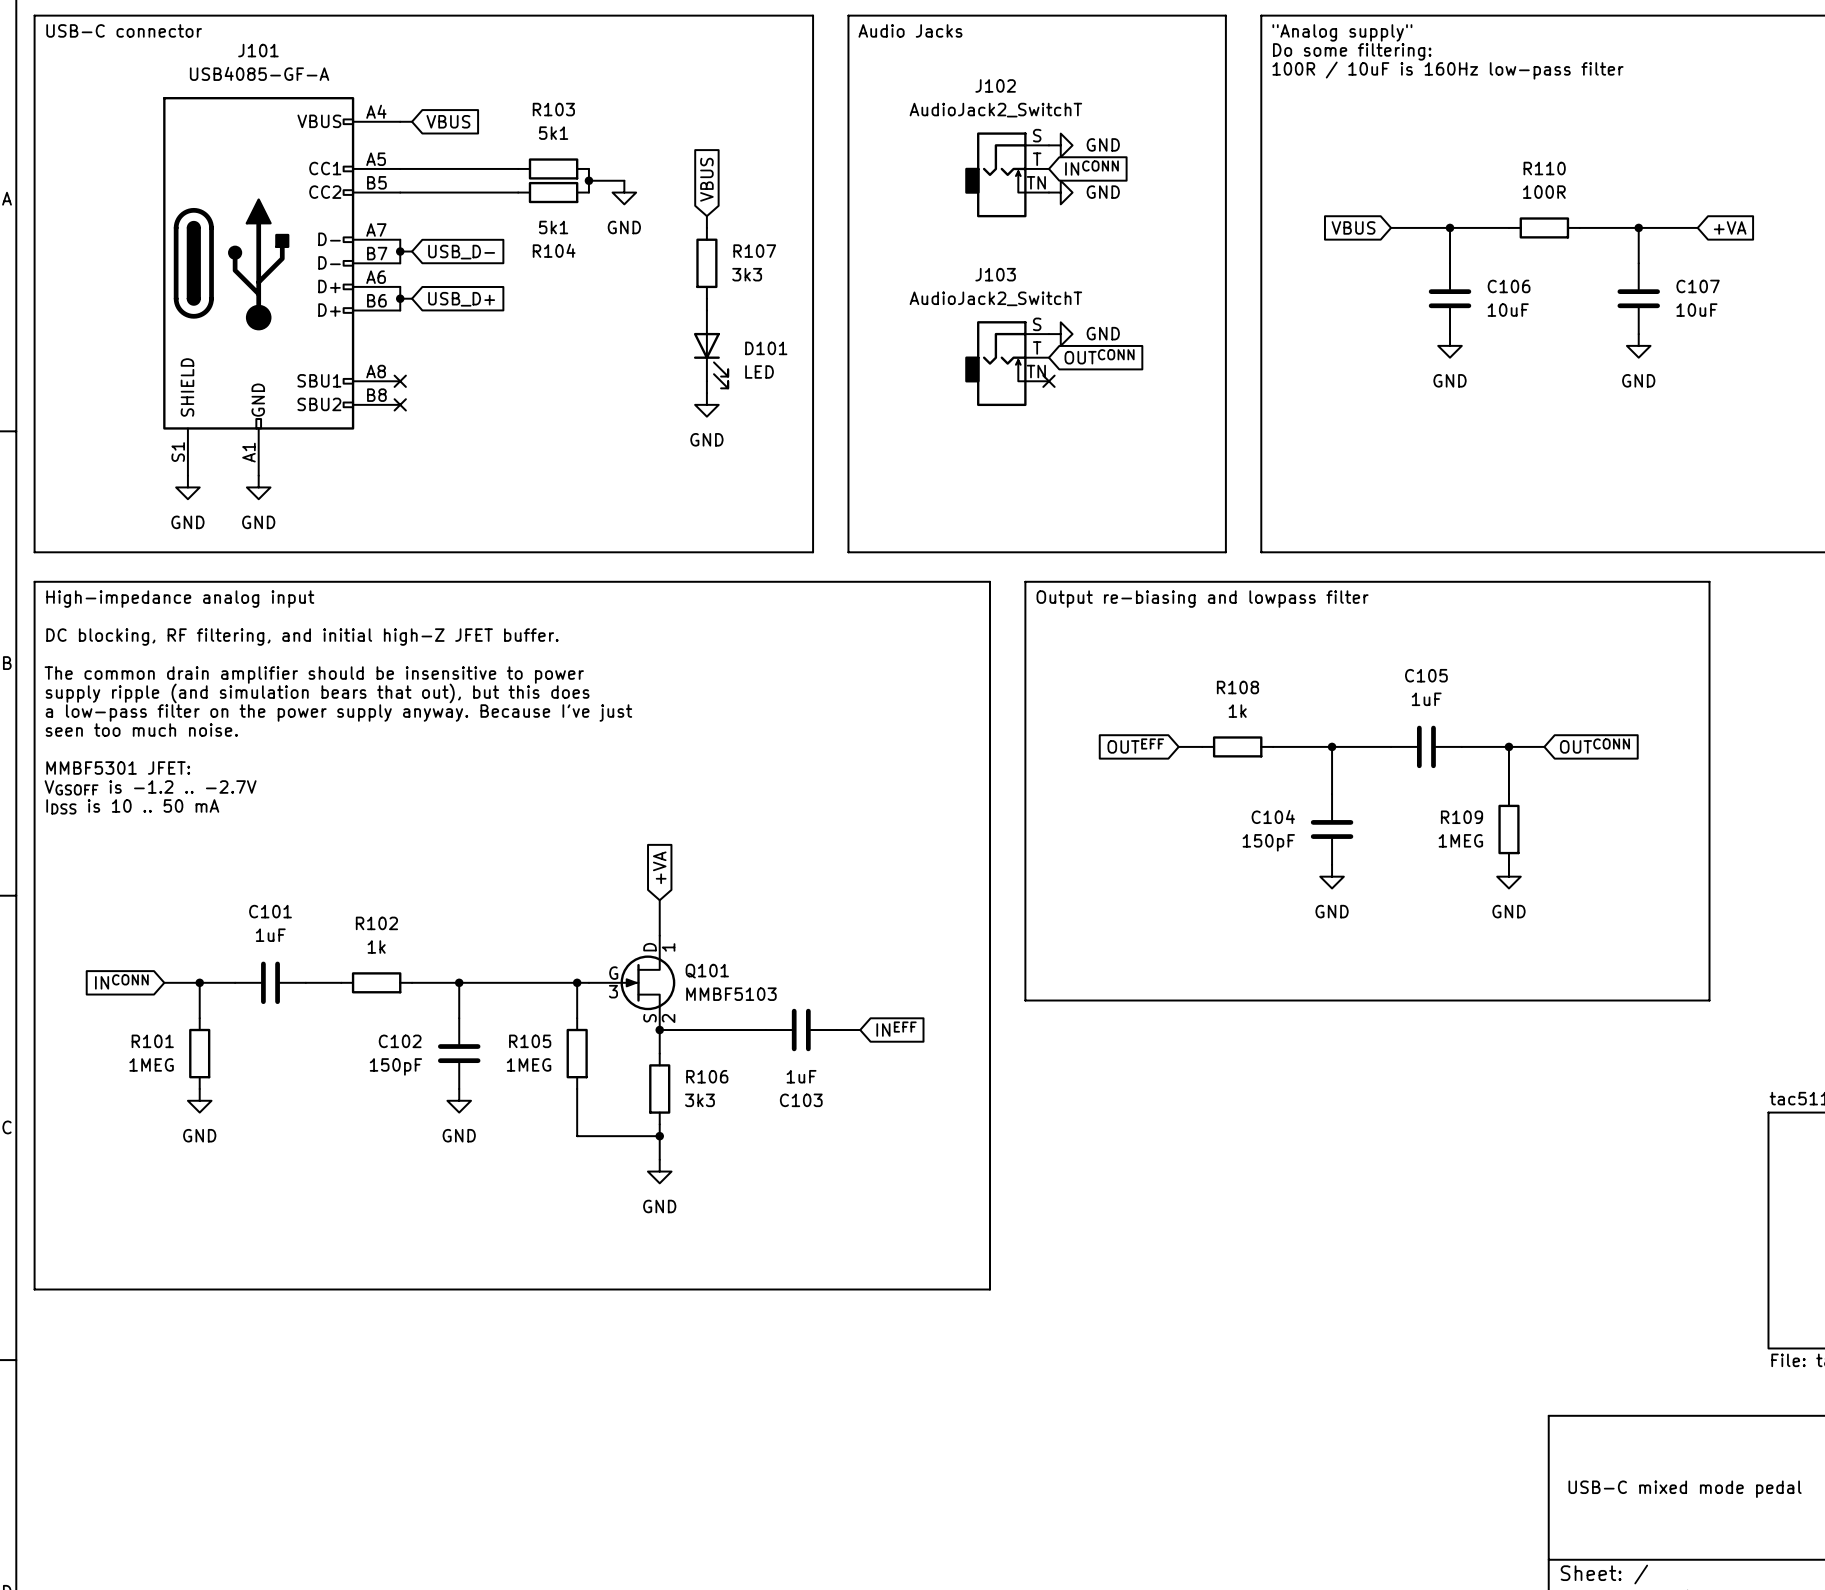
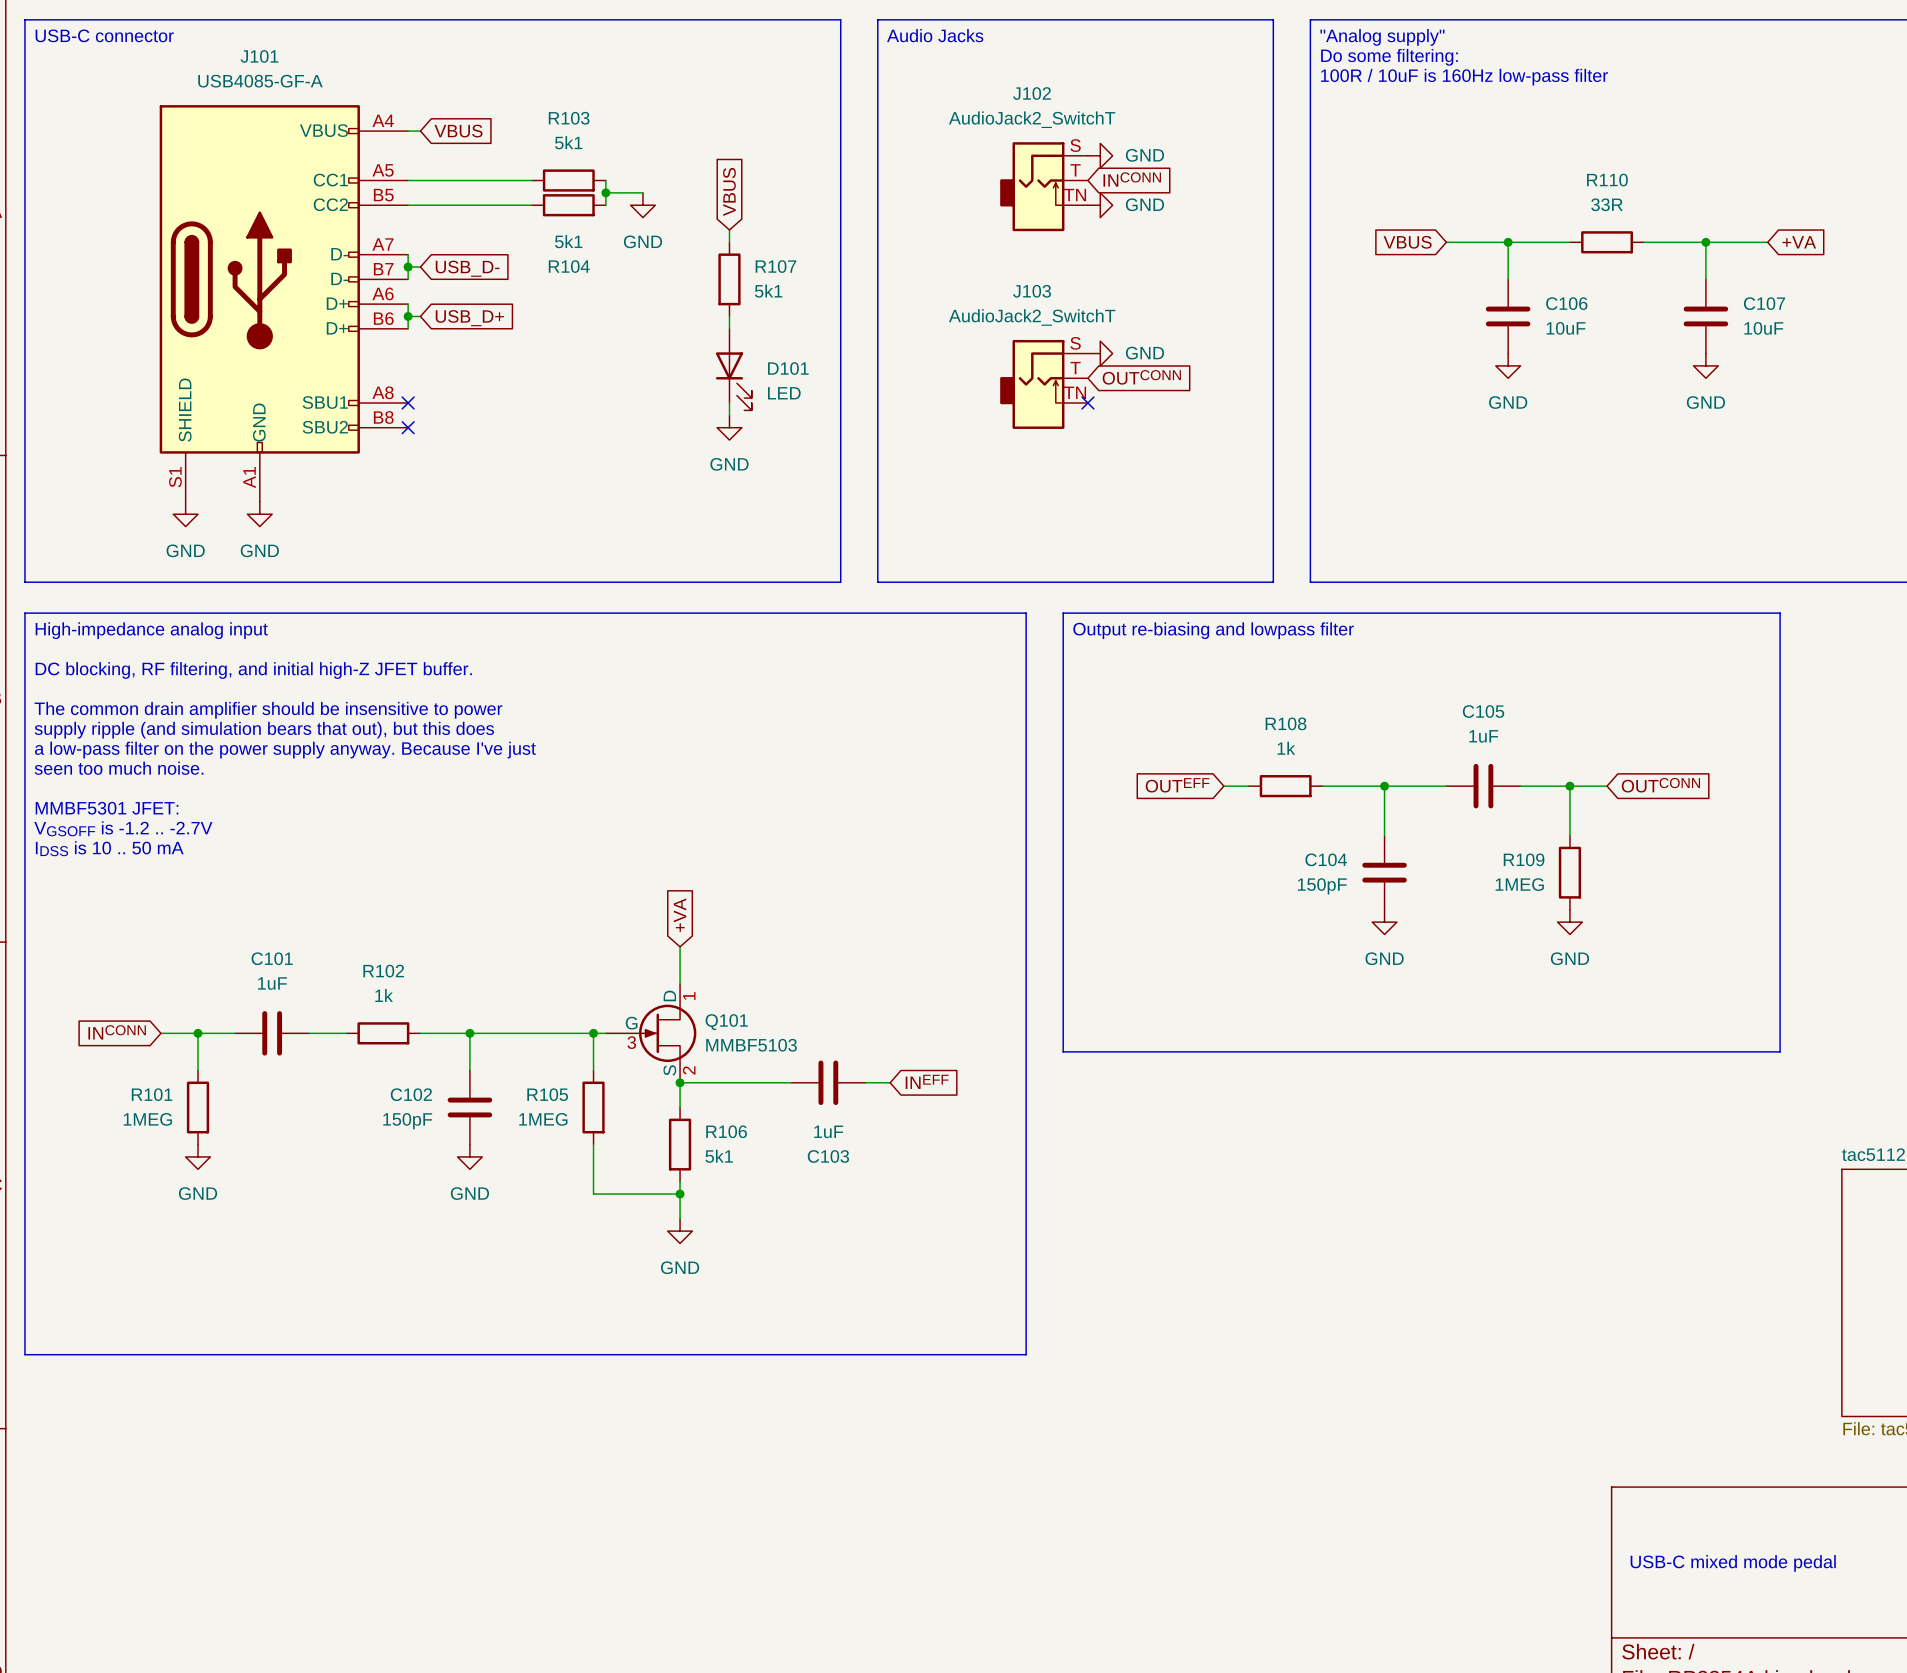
R110 value: 100R (1544, 192) -> 33R (1606, 204)
R107 value: 3k3 (747, 274) -> 5k1 (768, 291)
R106 value: 3k3 (699, 1100) -> 5k1 (719, 1156)

